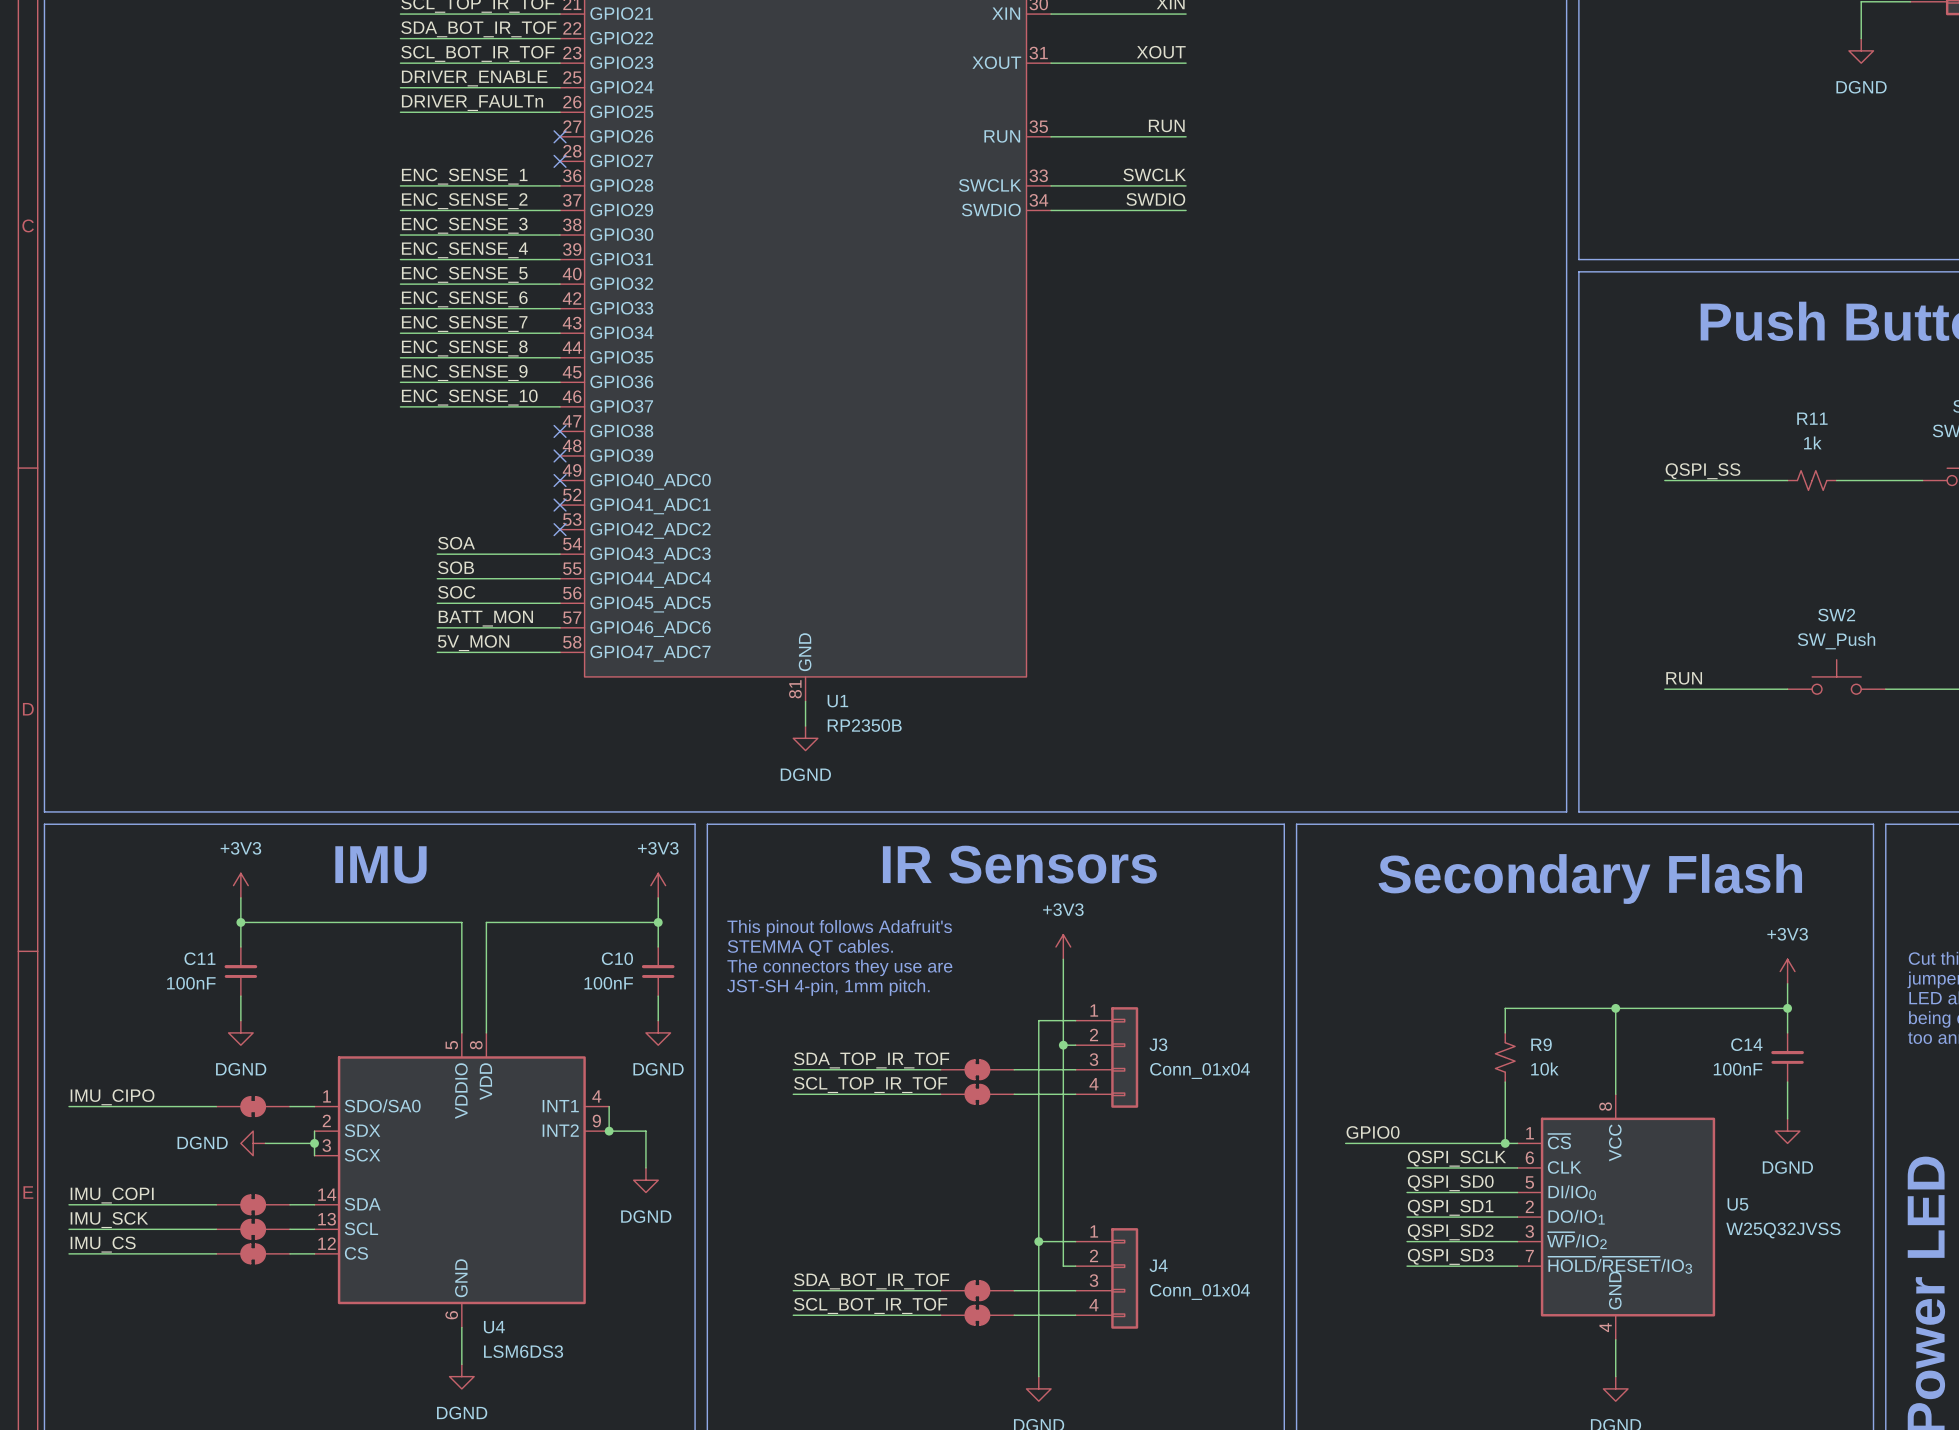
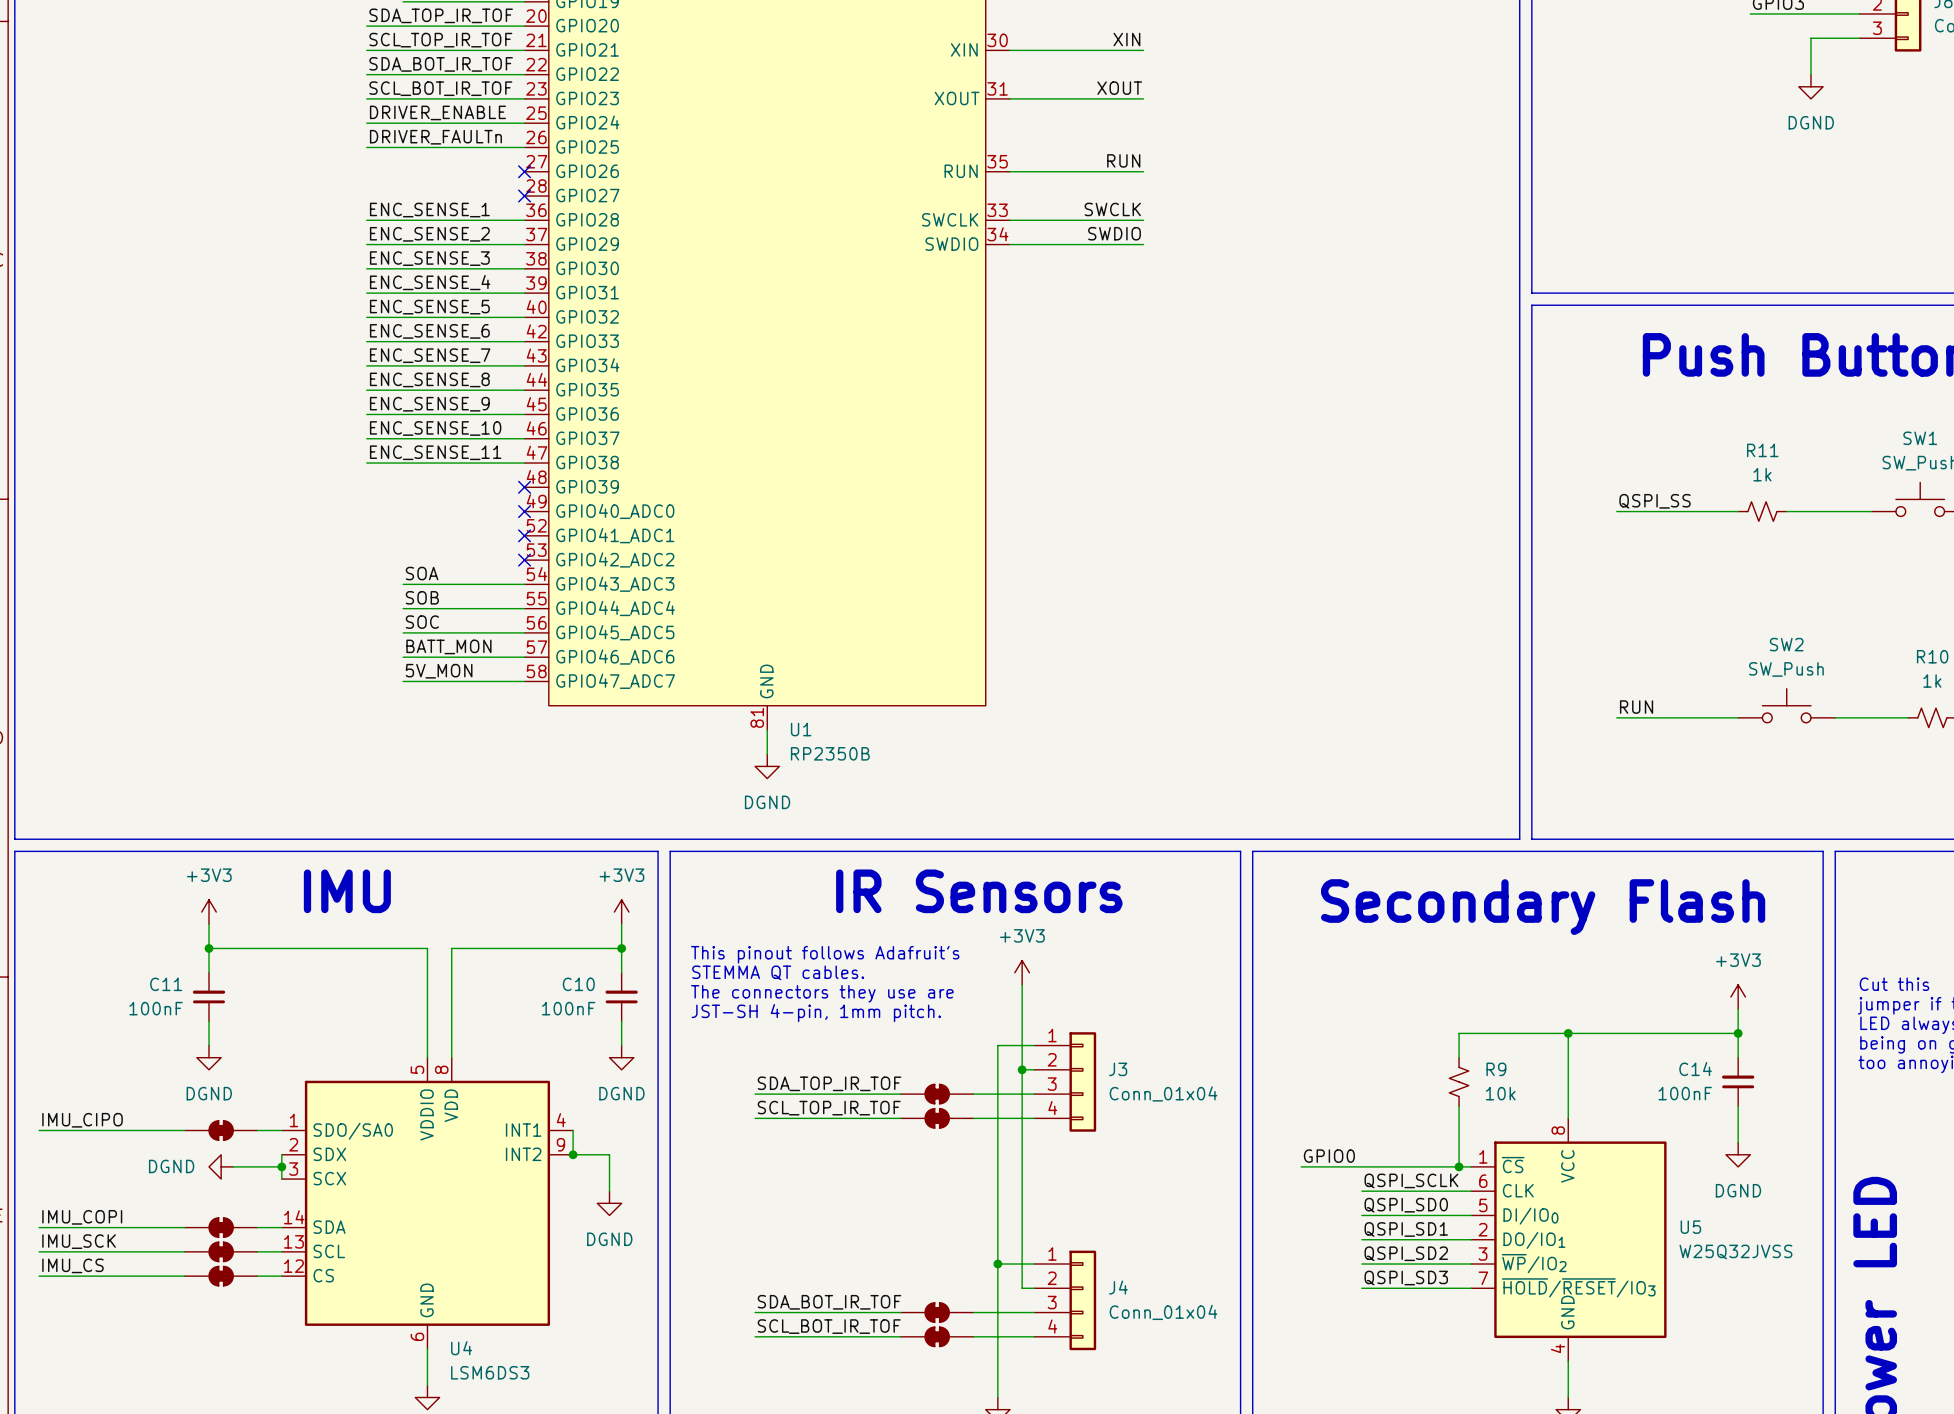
label: none -> ENC_SENSE_11 (435, 452)
wire: none -> (366, 463) (524, 463)
no-connect mark: (560, 431) -> none

